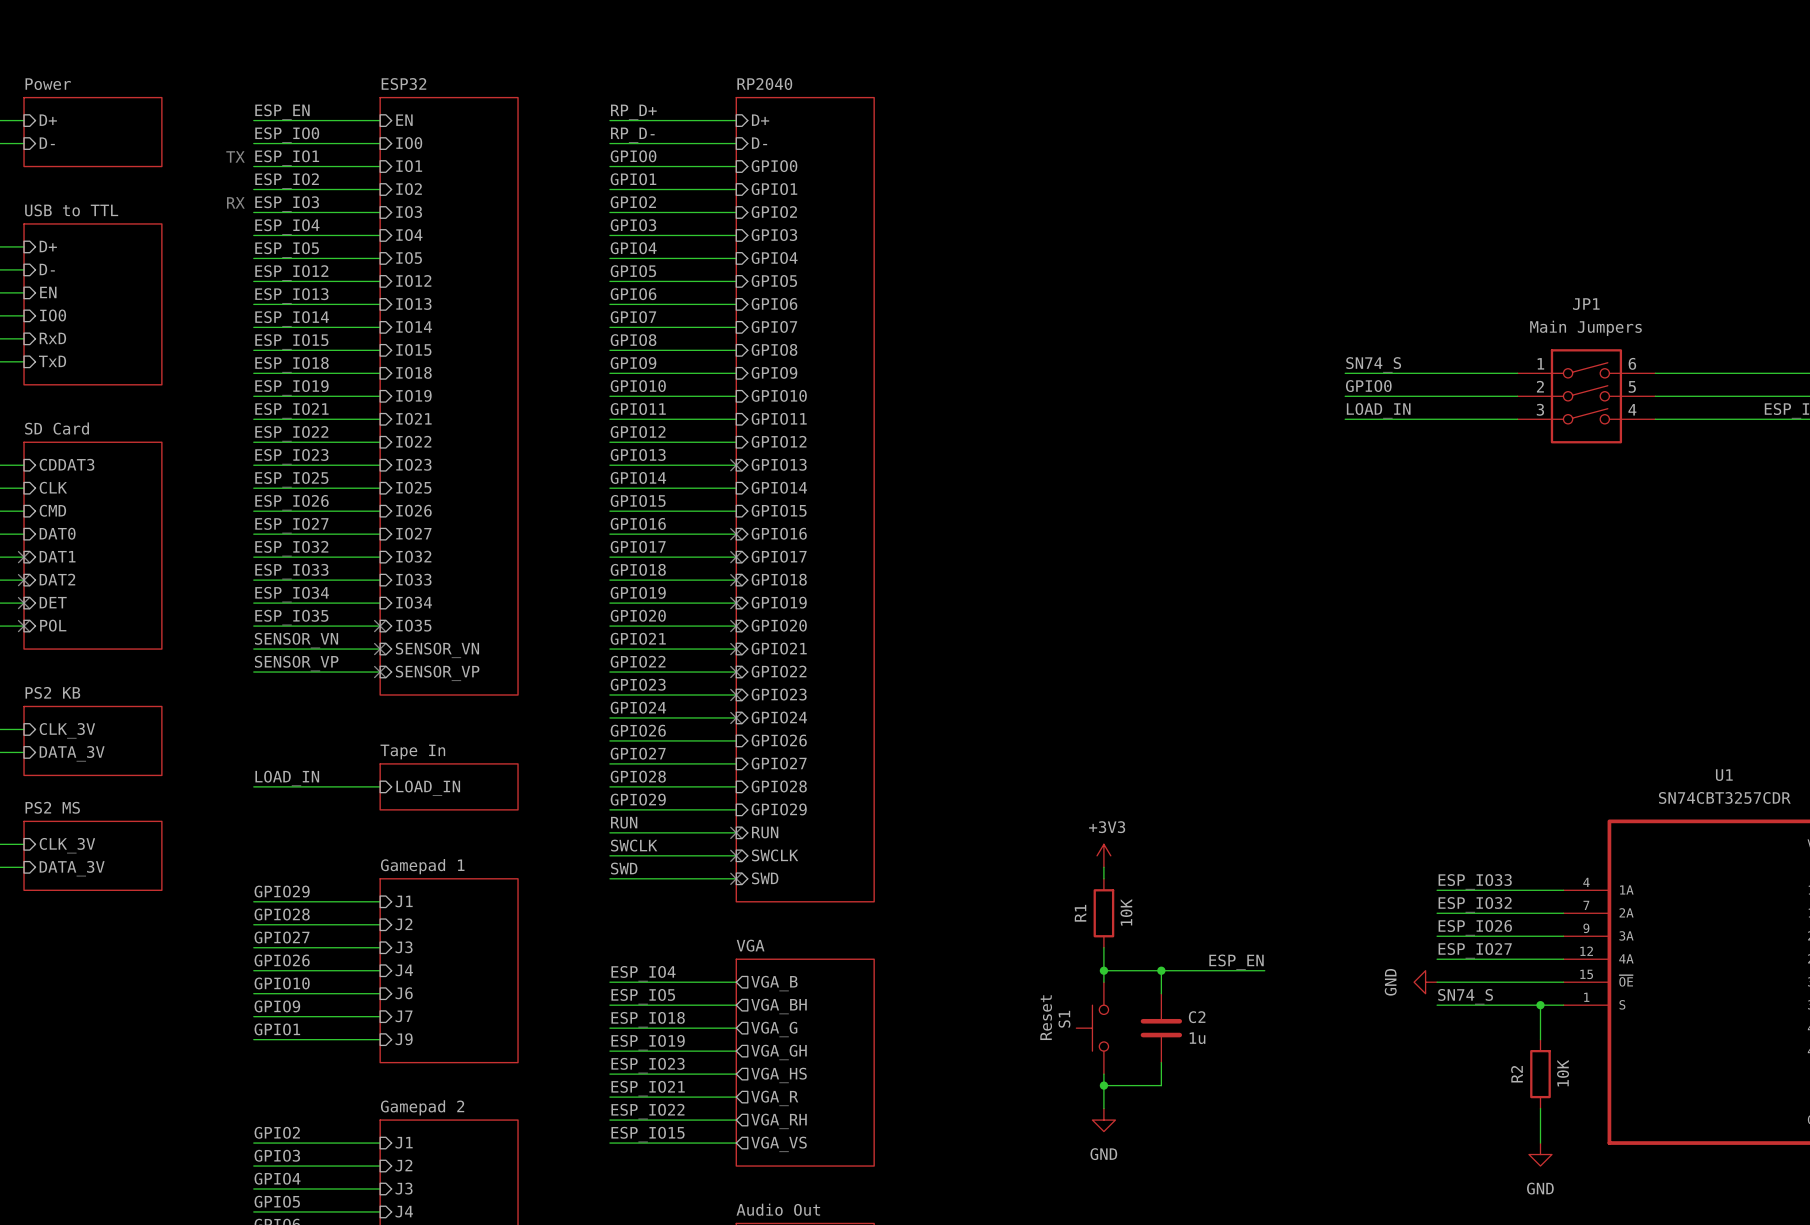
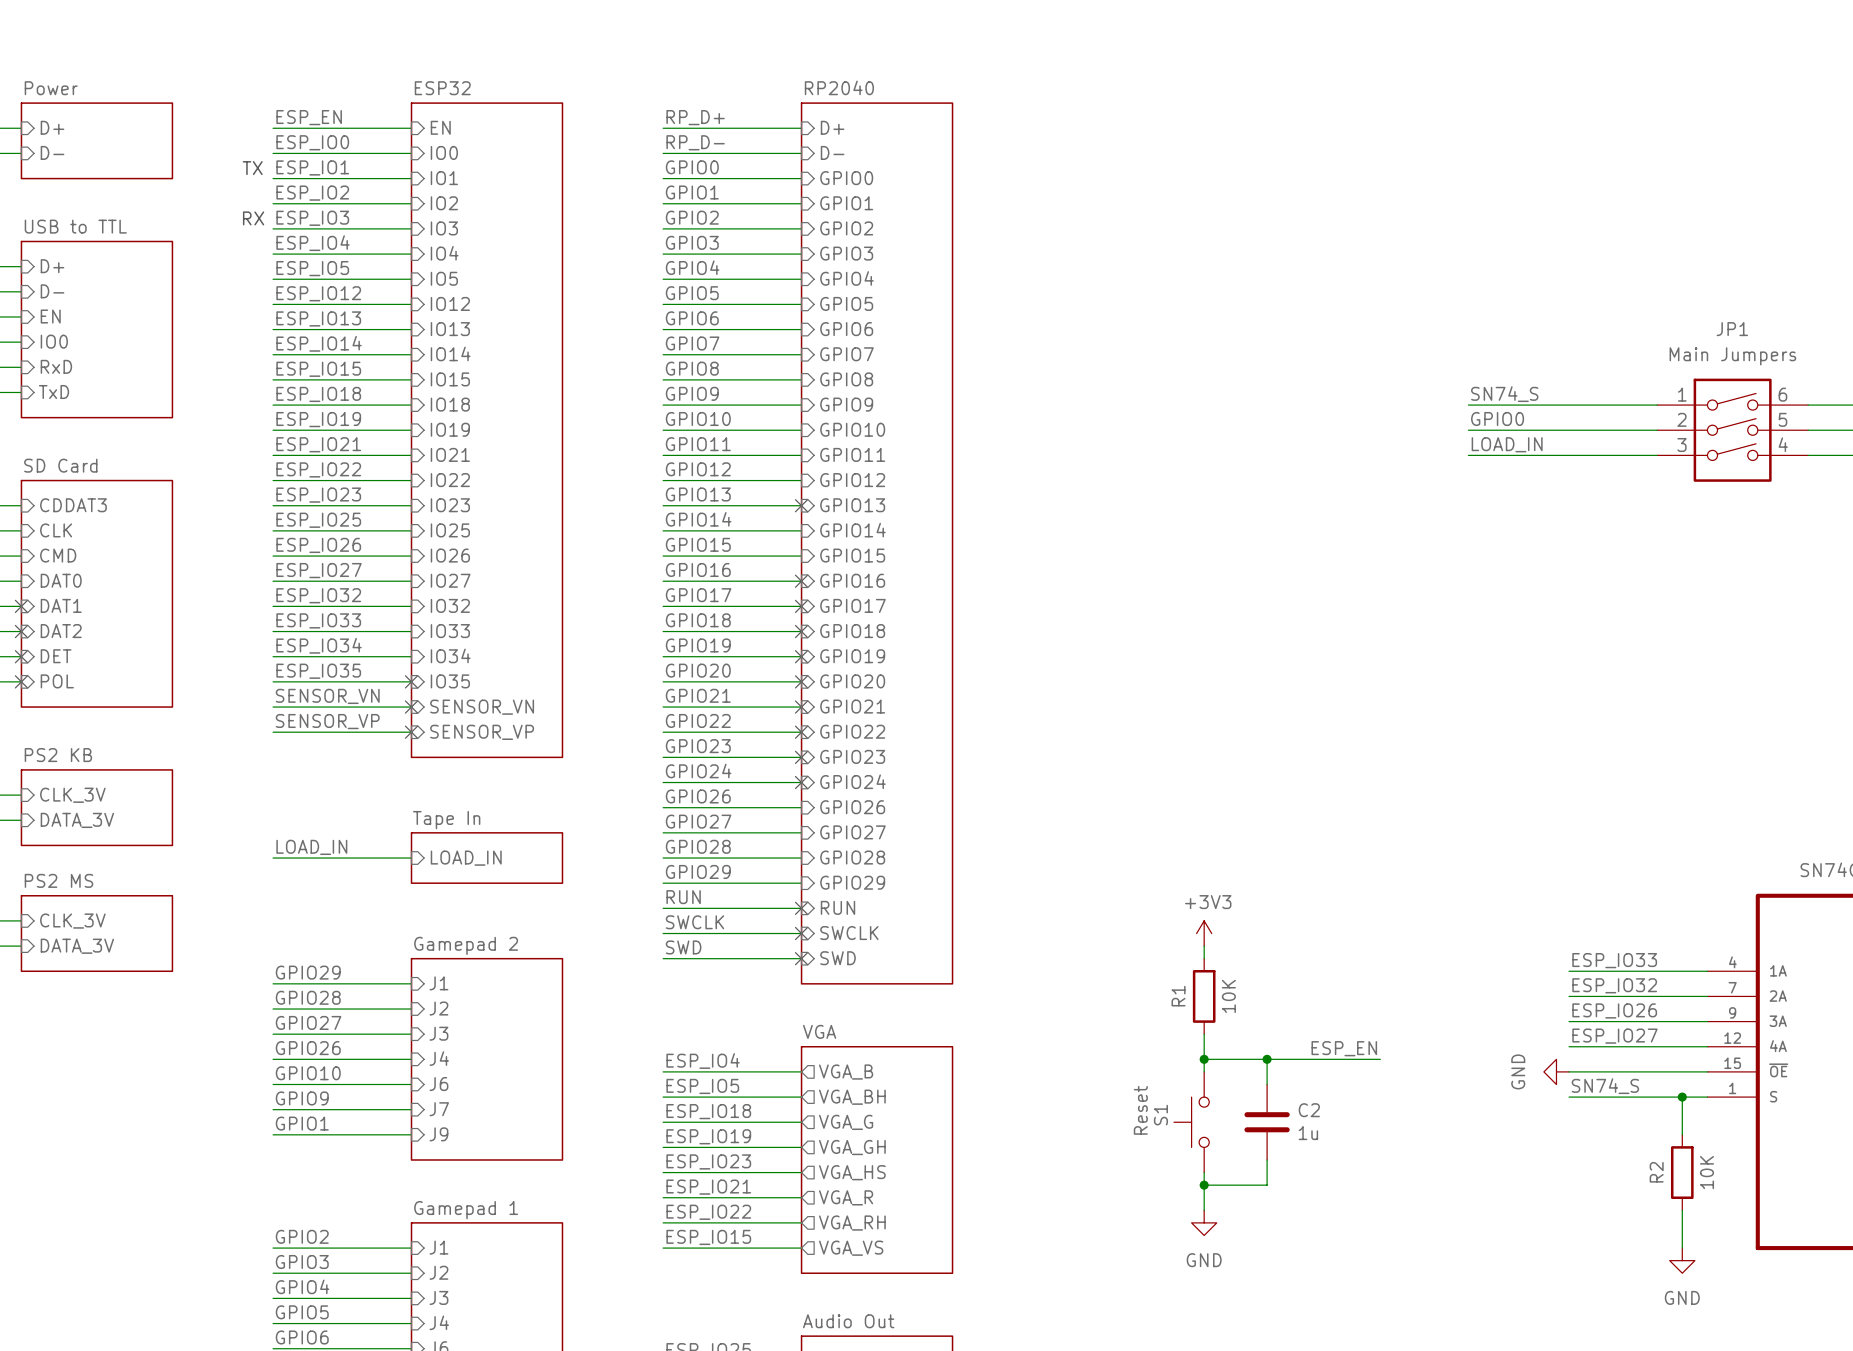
sheet Gamepad 1 name: Gamepad 1 (422, 866) -> Gamepad 2 (466, 945)
sheet Gamepad 2 name: Gamepad 2 (422, 1107) -> Gamepad 1 (466, 1210)

